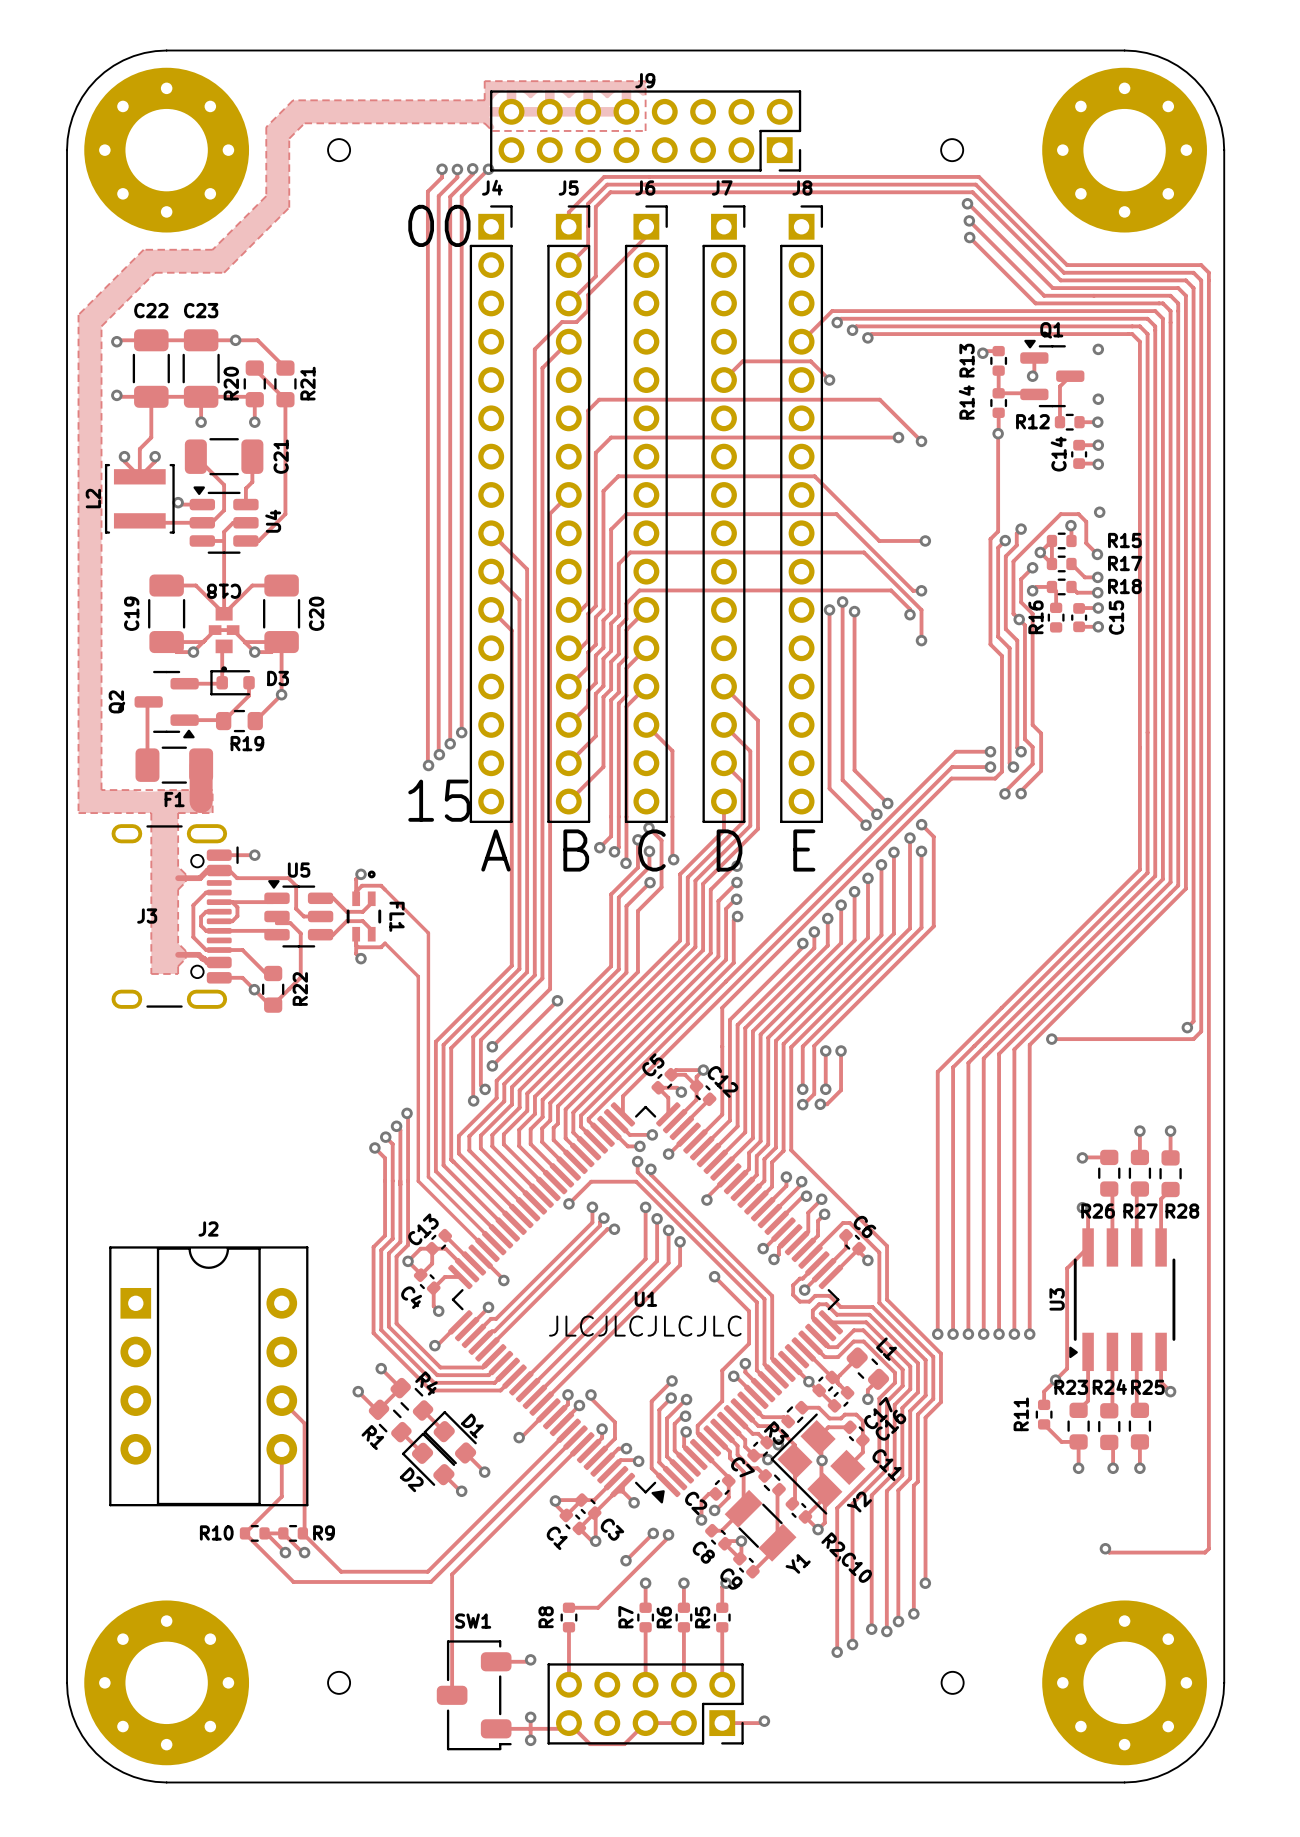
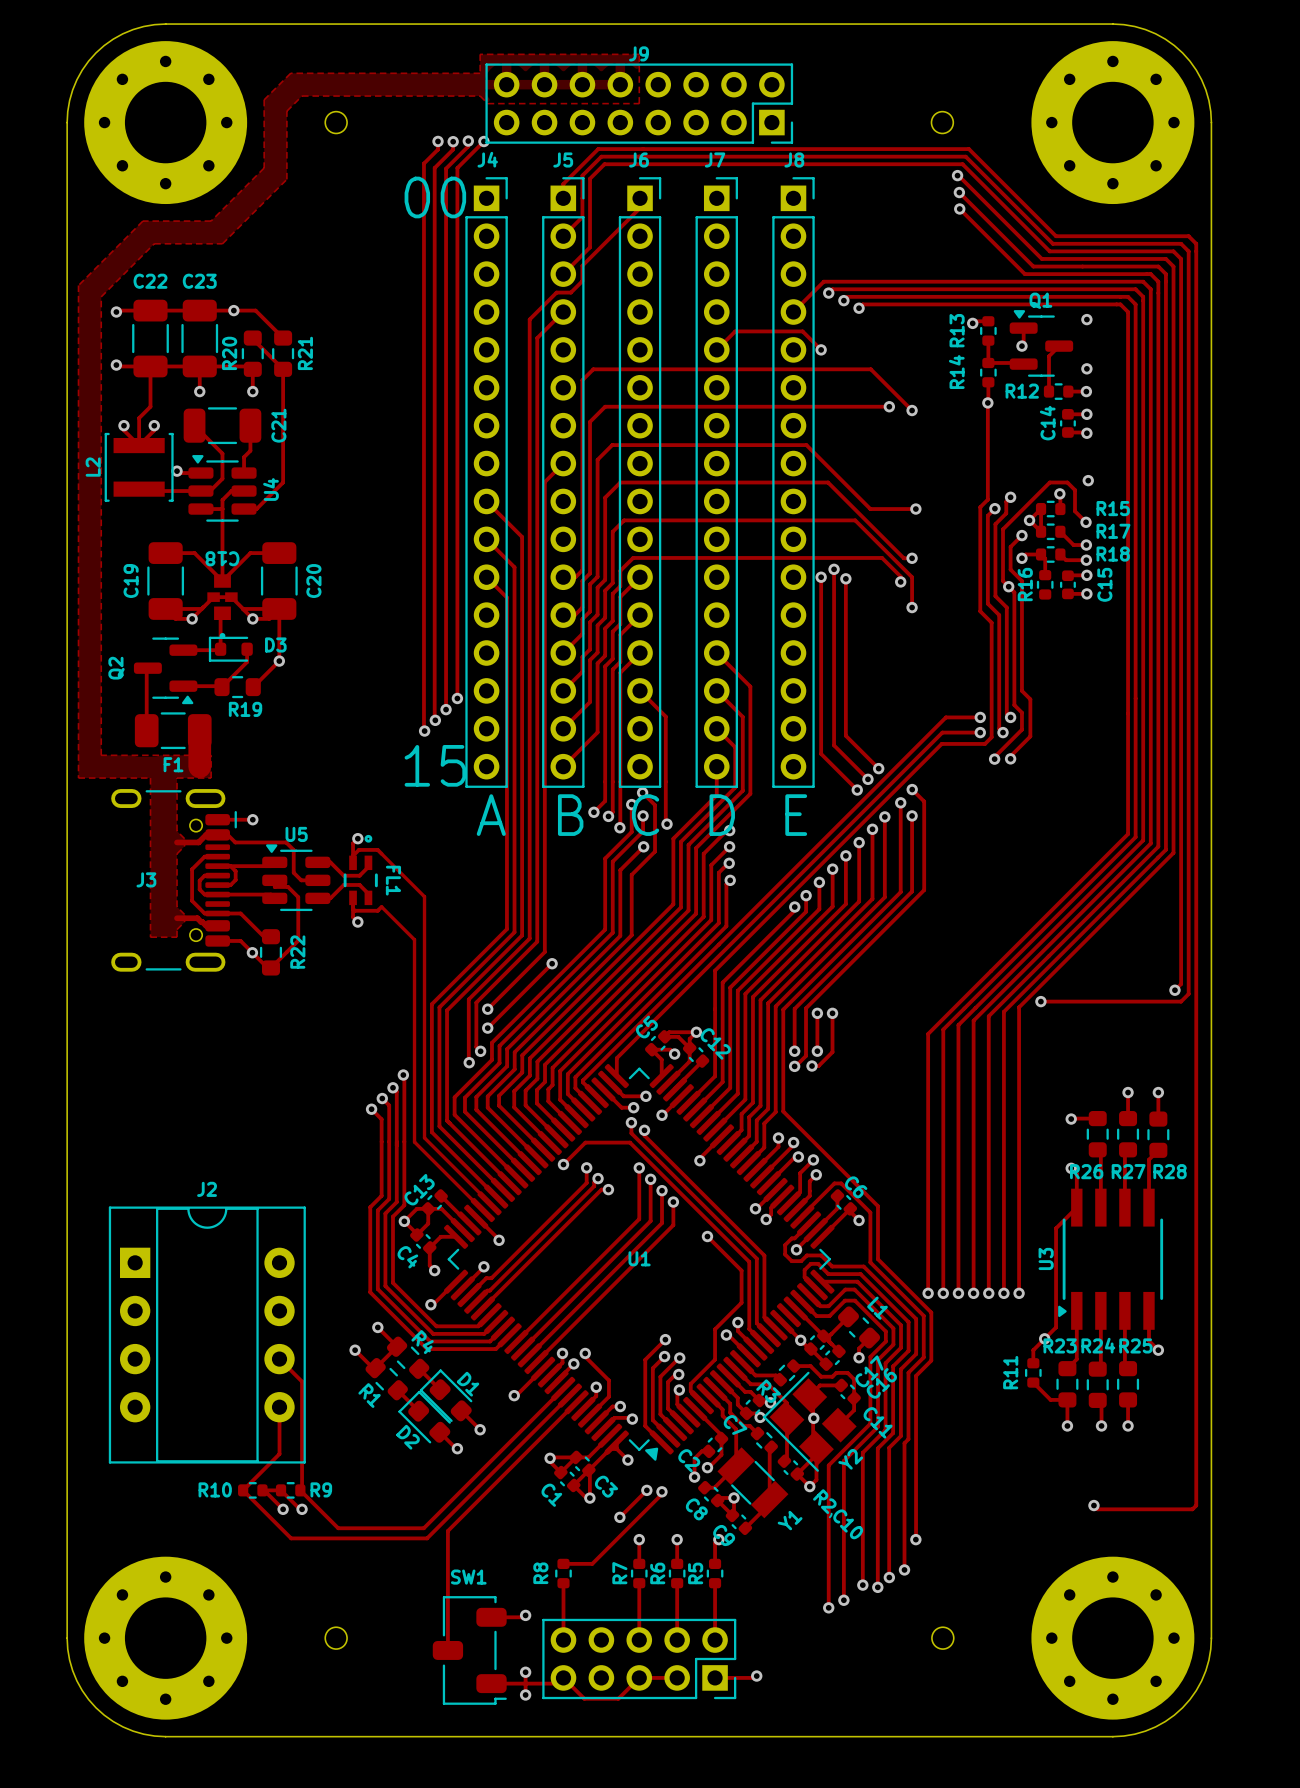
text: JLCJLCJLCJLC (645, 1326) -> none

